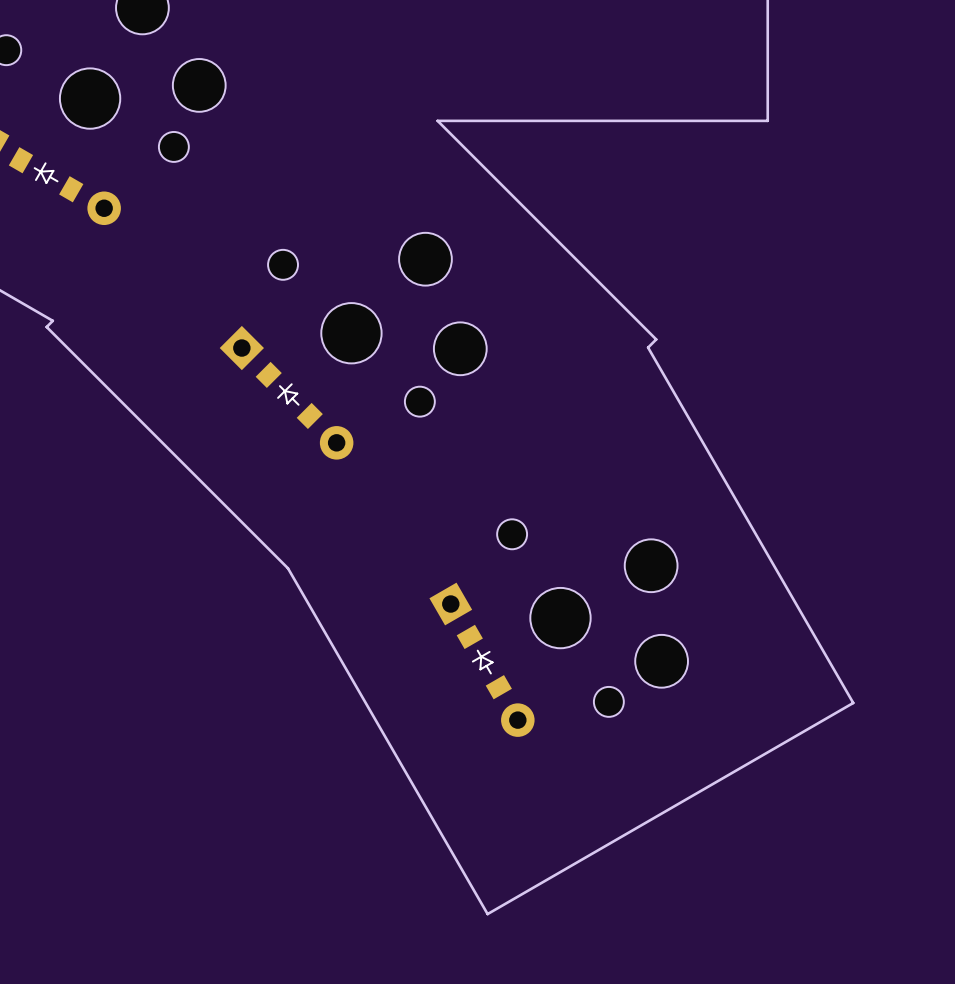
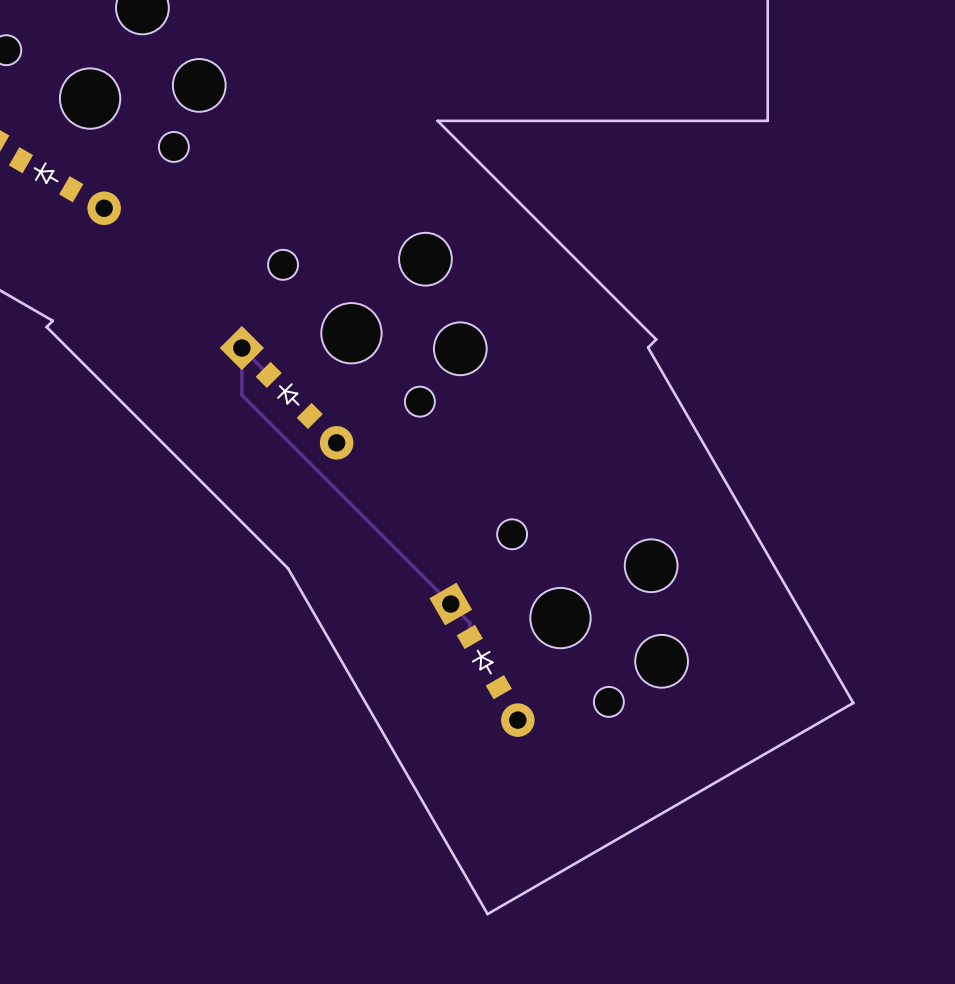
track: none -> (268, 374) (241, 348) (241, 395) (469, 623) (469, 636)

